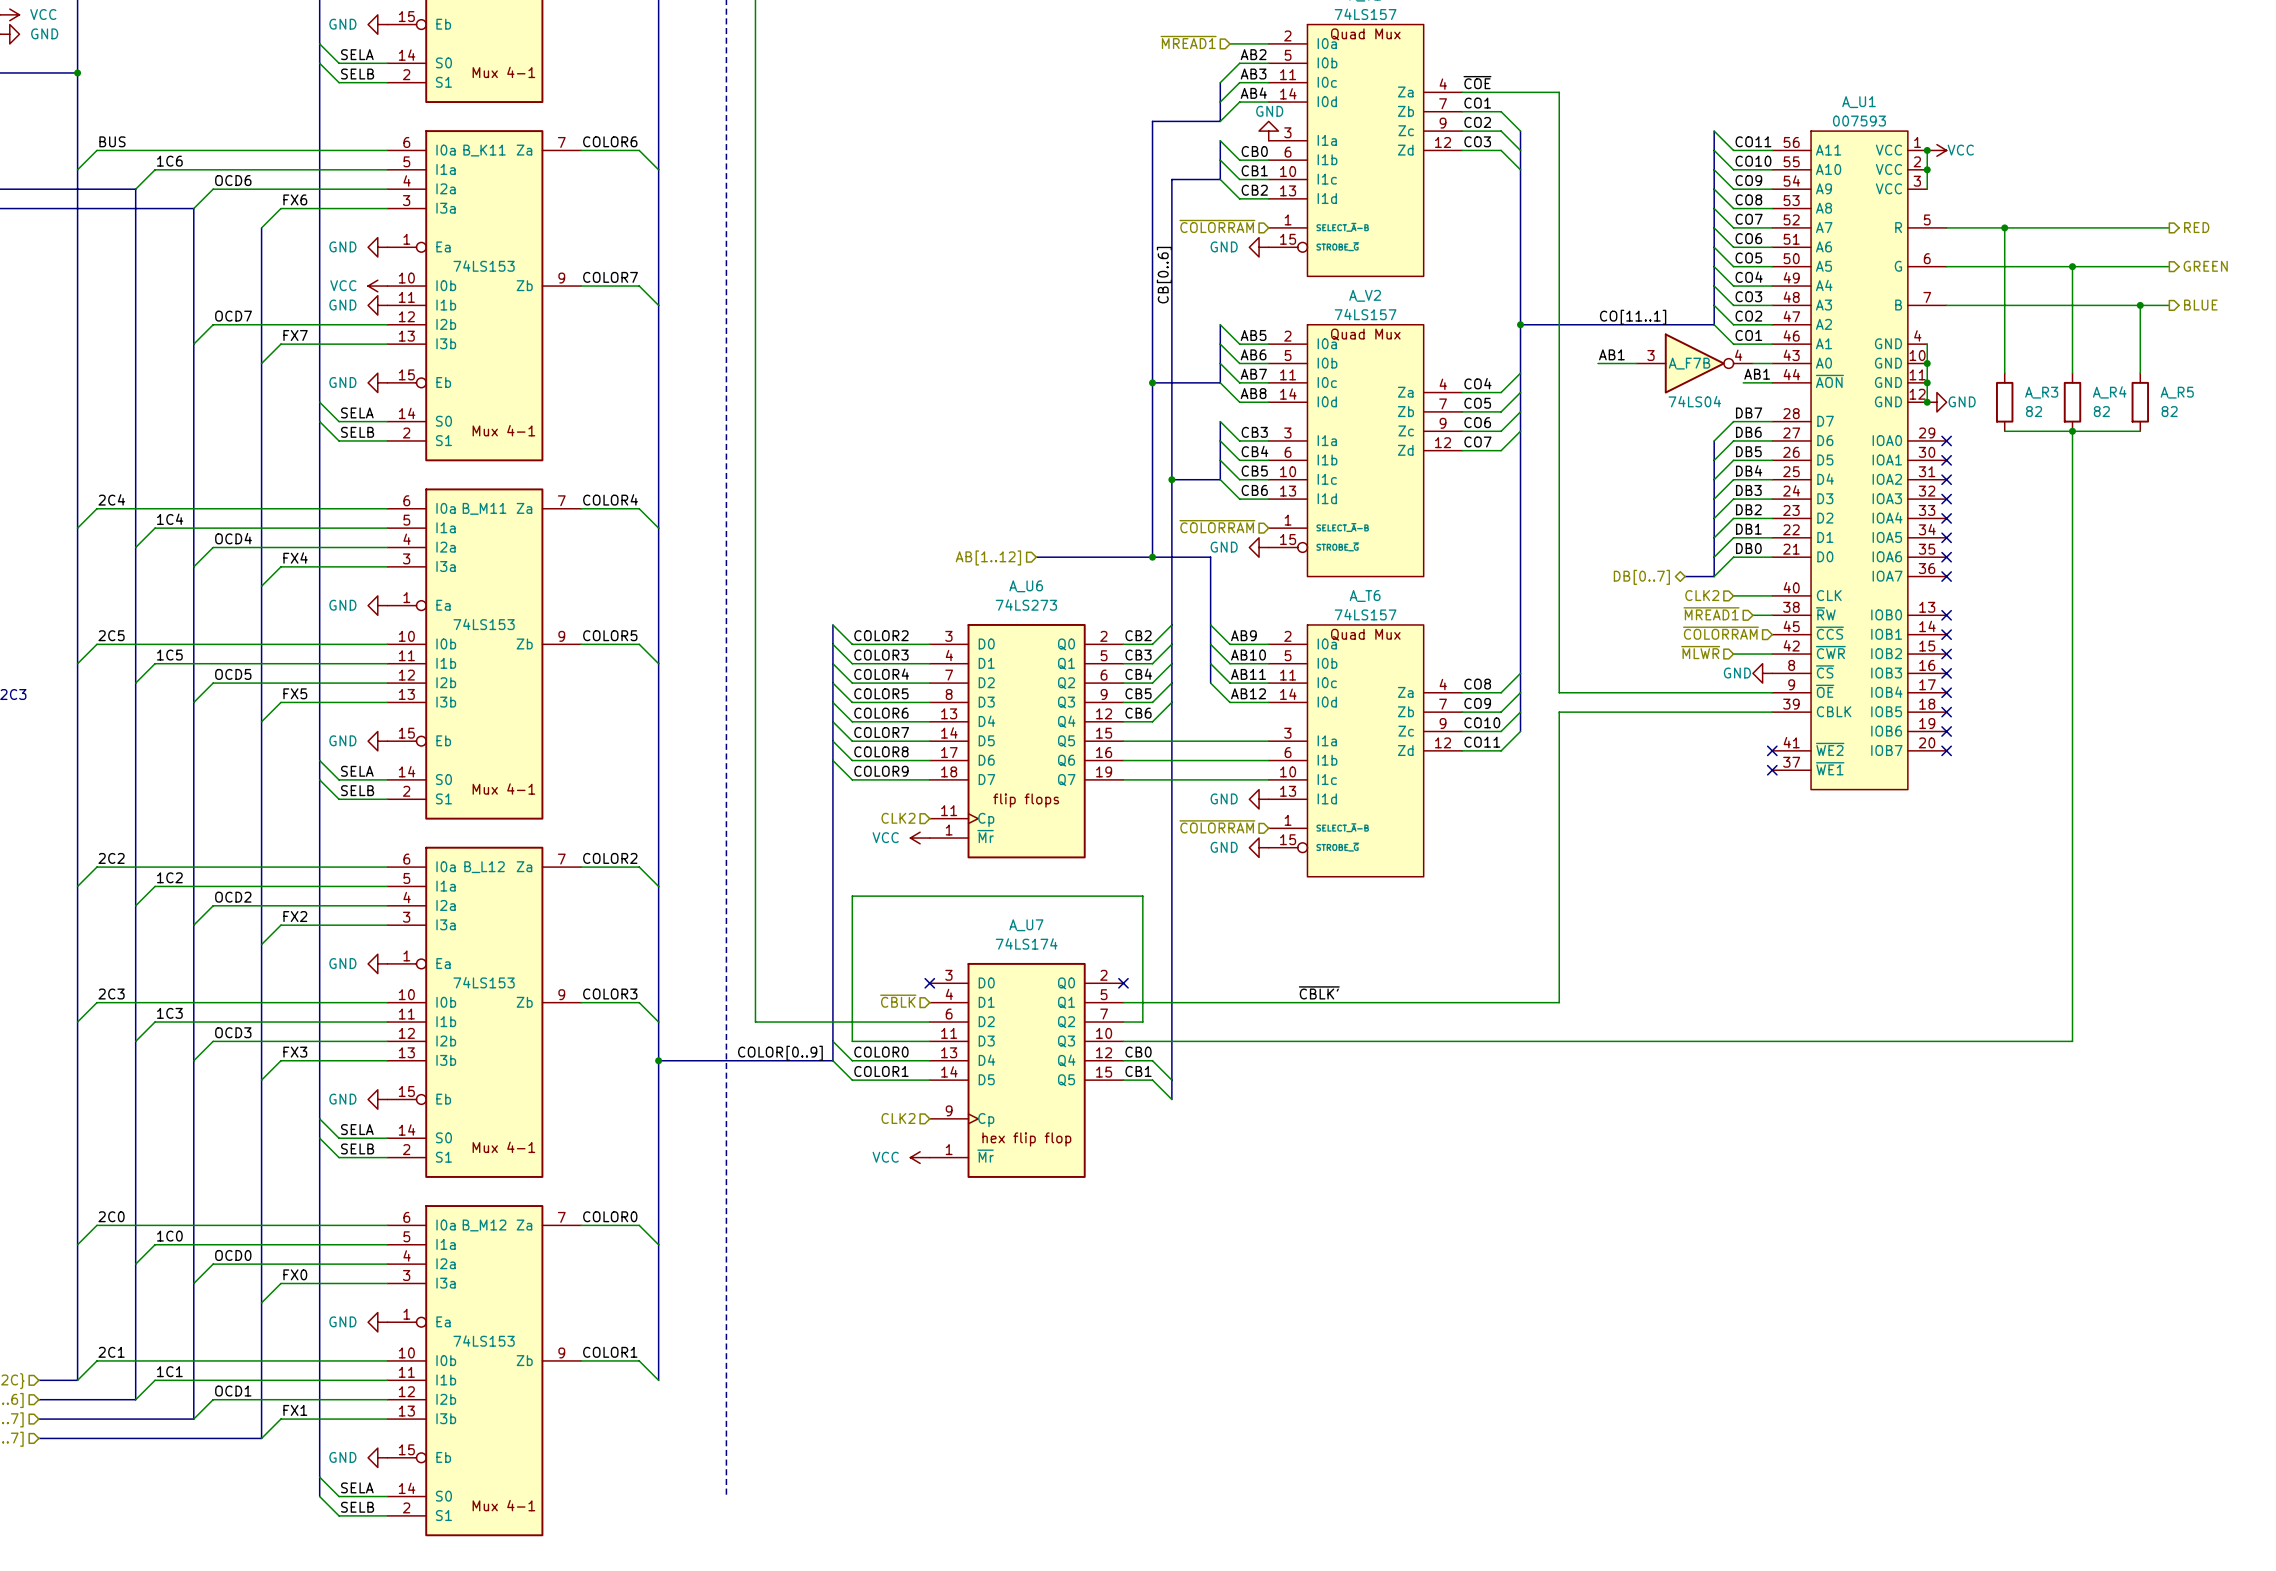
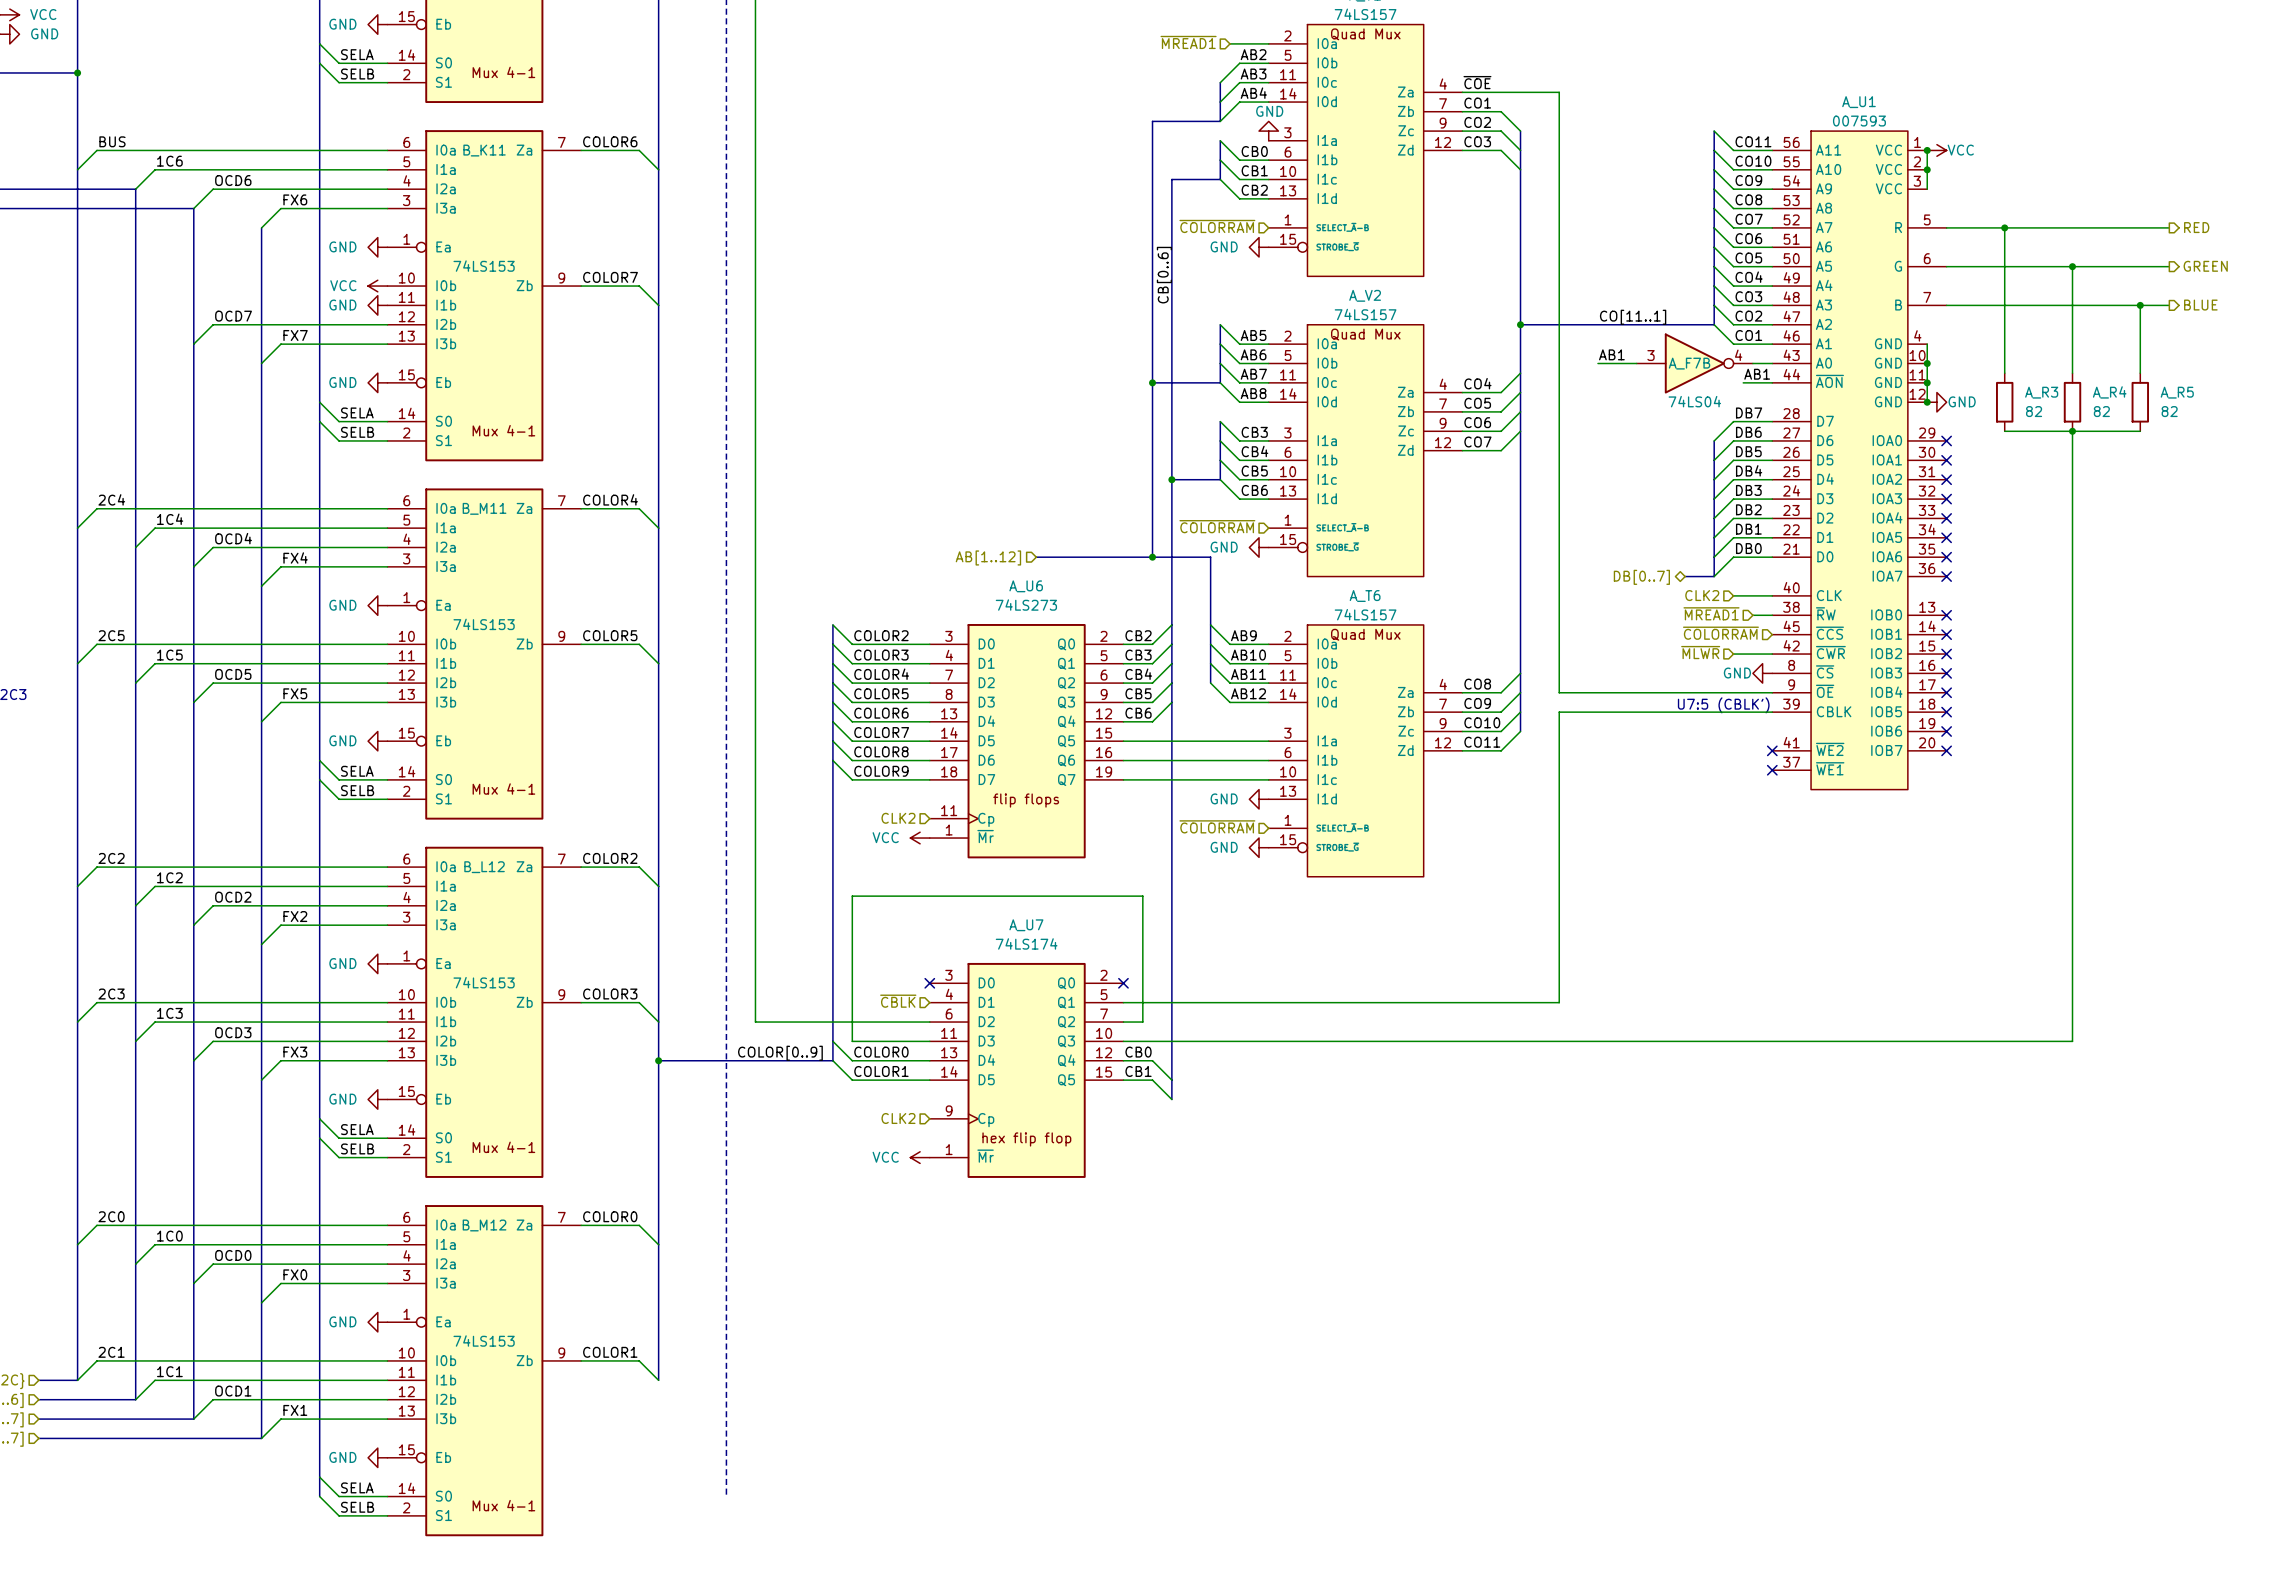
text: none -> U7:5 (CBLK') (1723, 705)
label: ~{CBLK'} (1319, 992) -> none

